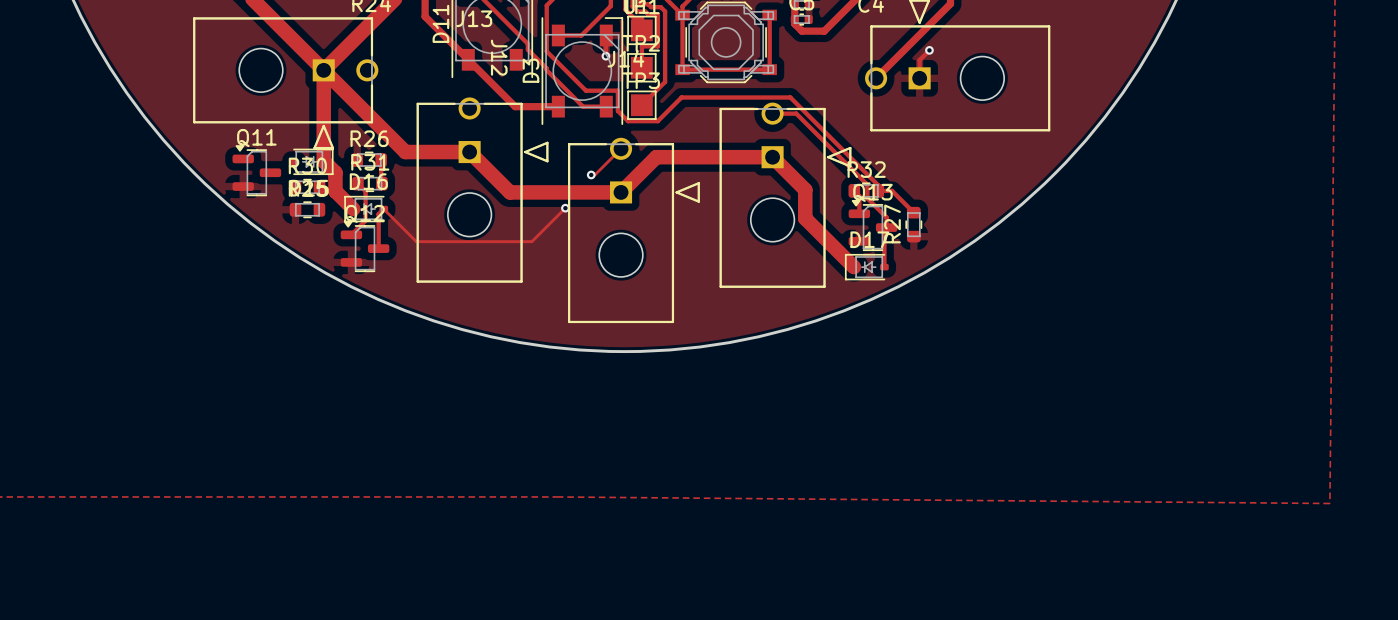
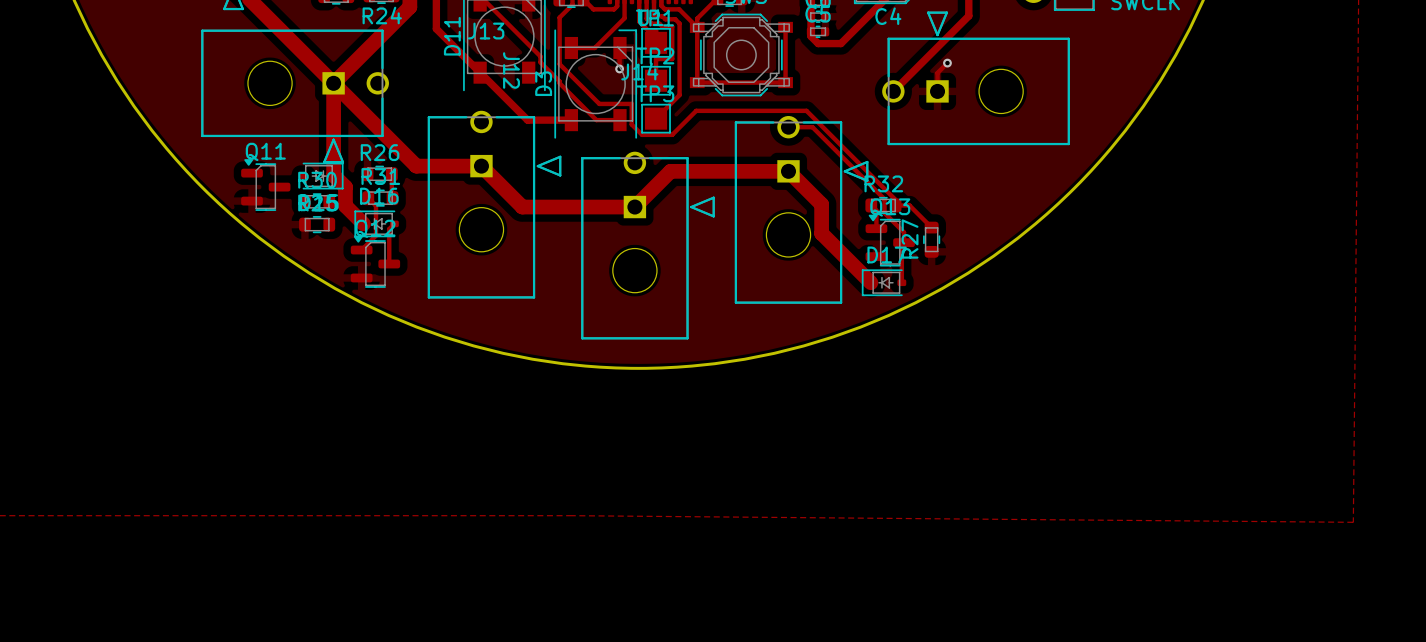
track: (621, 148) (594, 174) (591, 174) -> none
via: (591, 174) -> none
track: (565, 208) (531, 241) (416, 241) (383, 209) -> none
via: (565, 208) -> none

